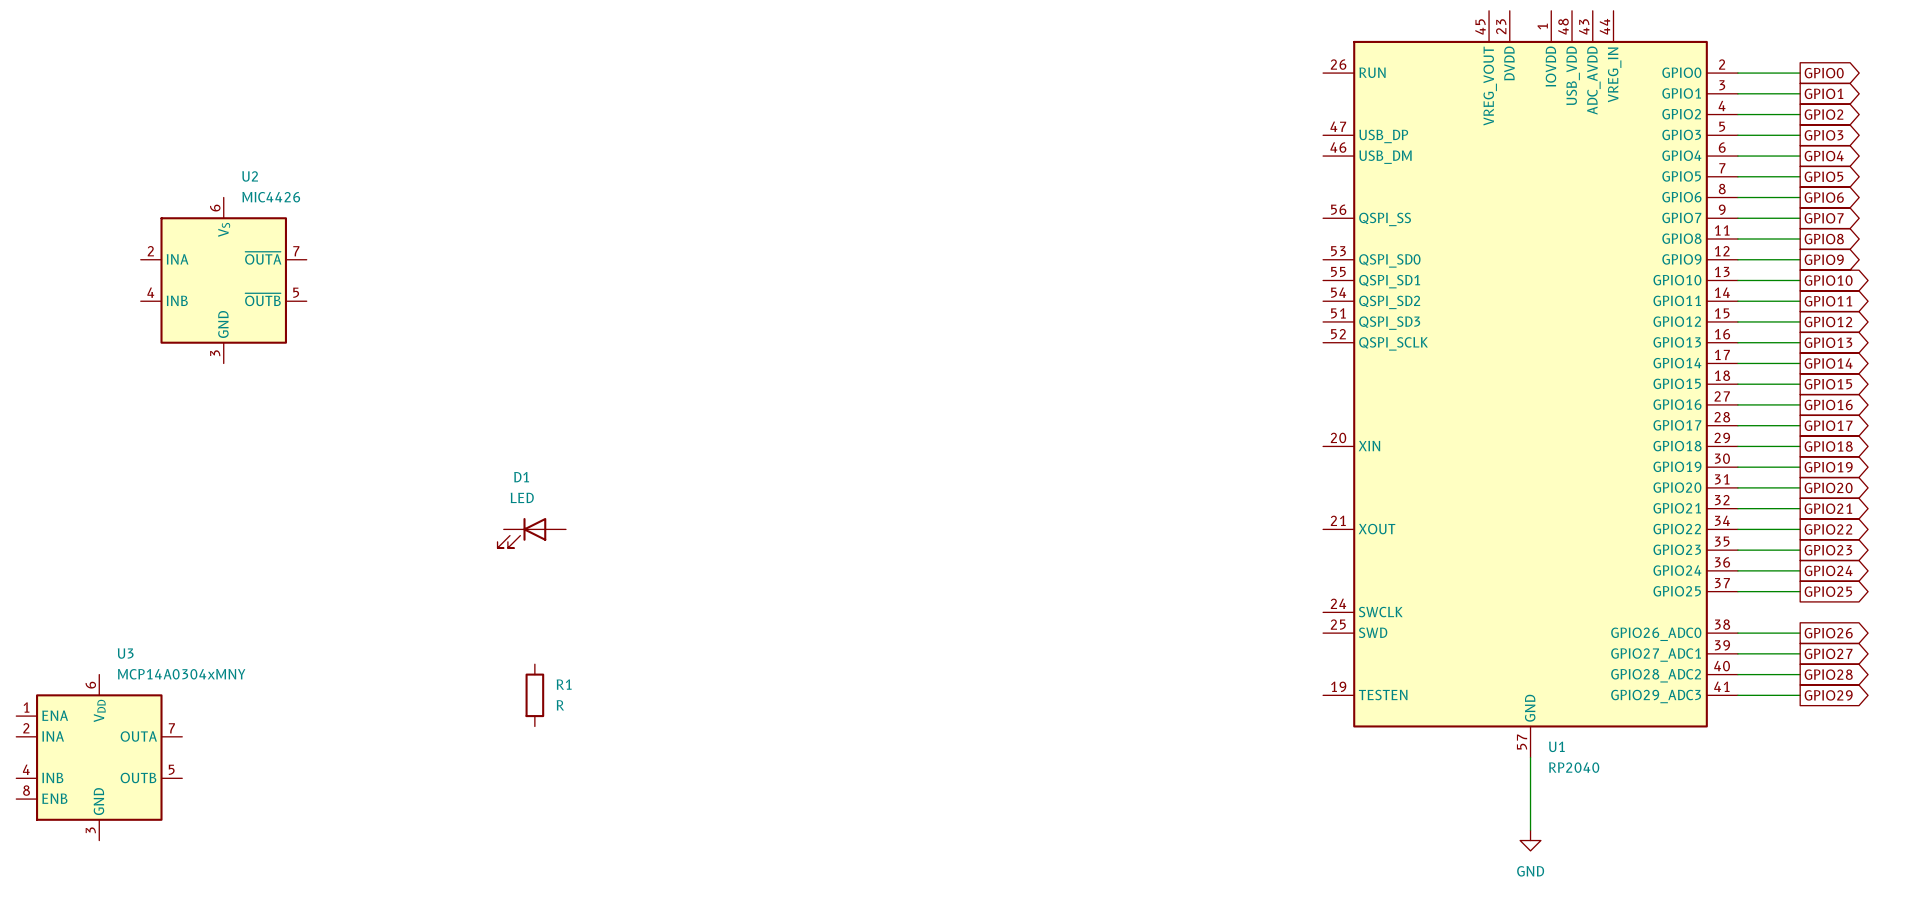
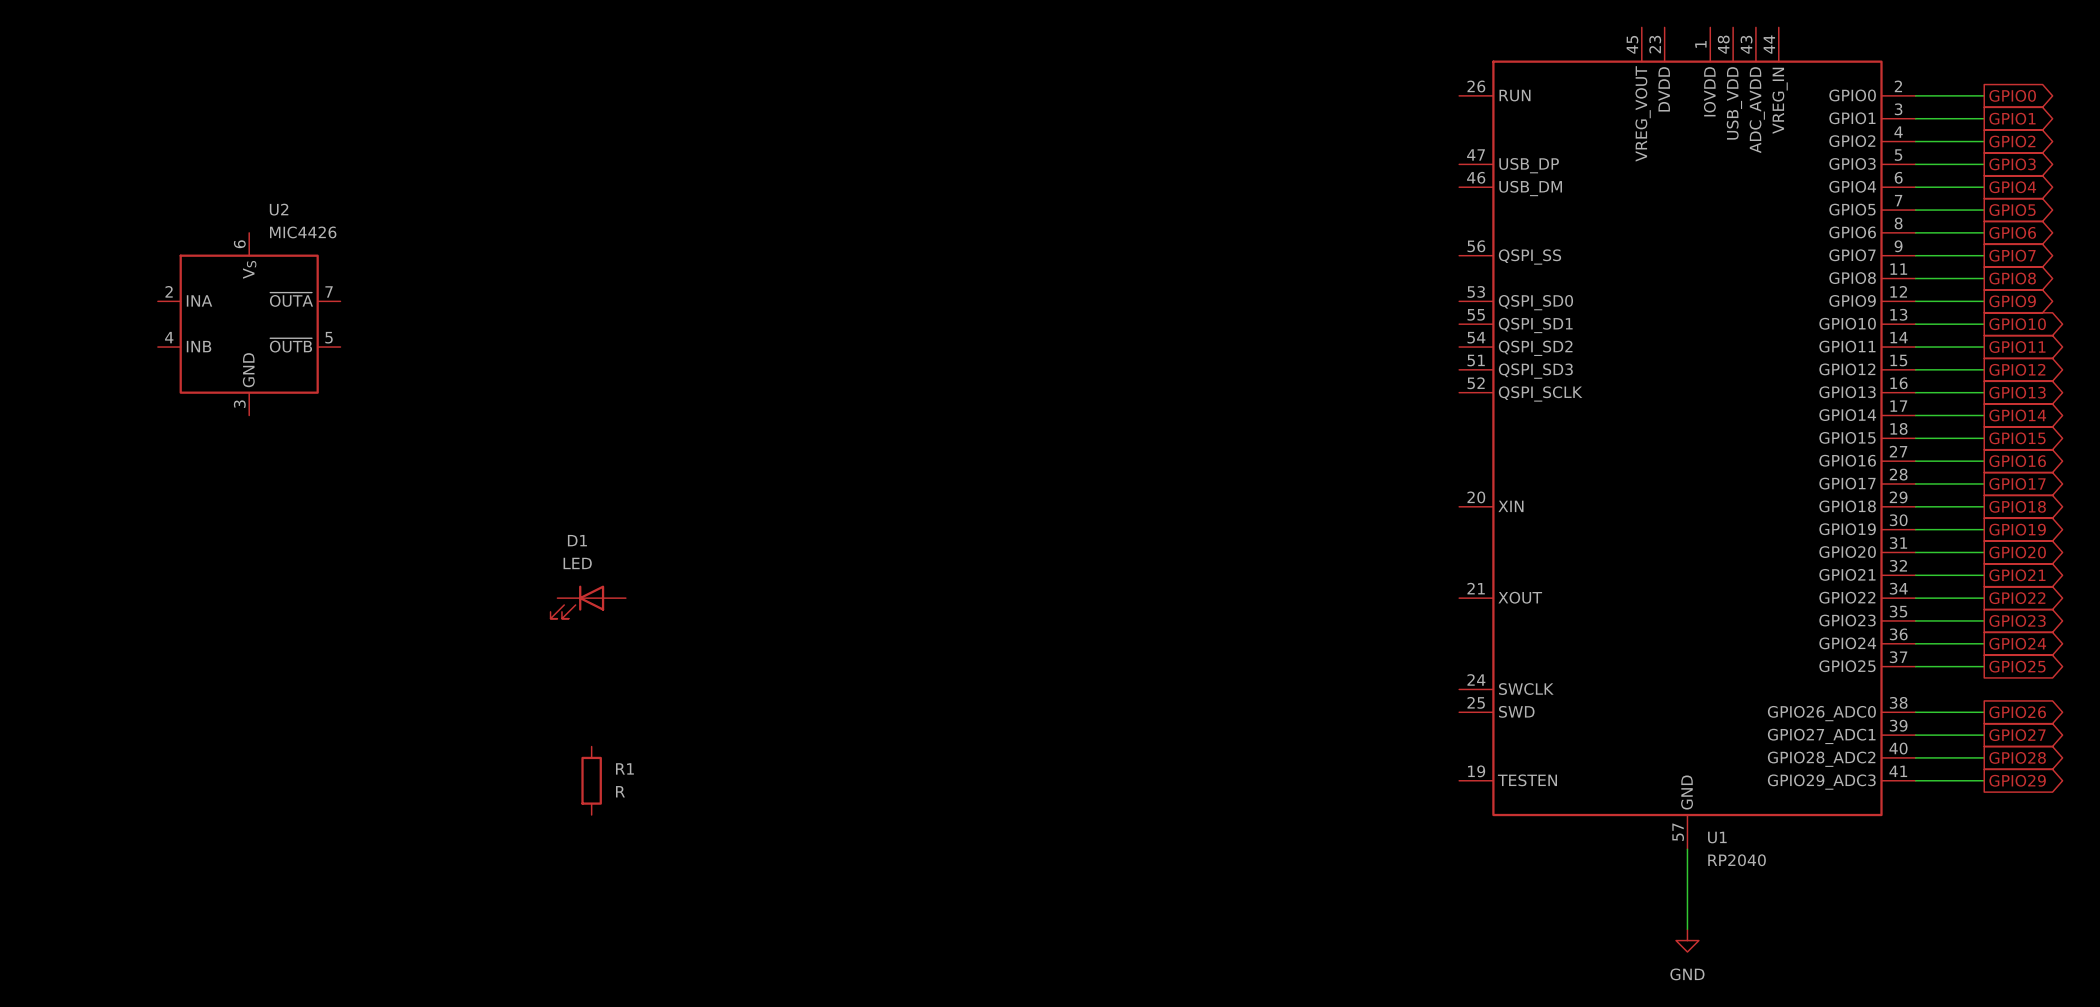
U3: MCP14A0304xMNY (99, 757) -> none

